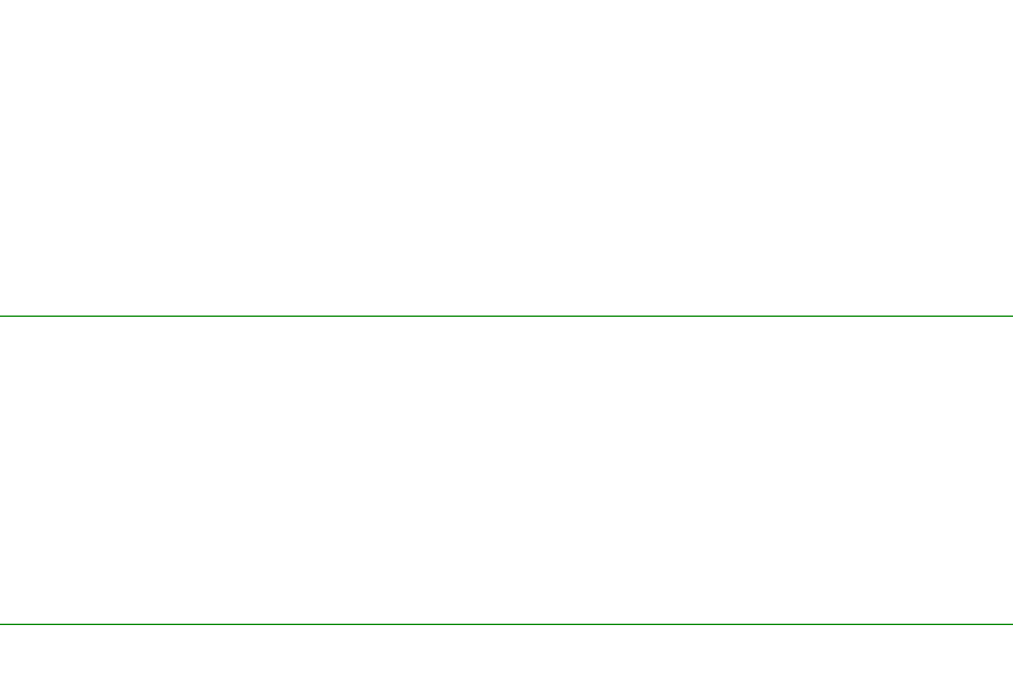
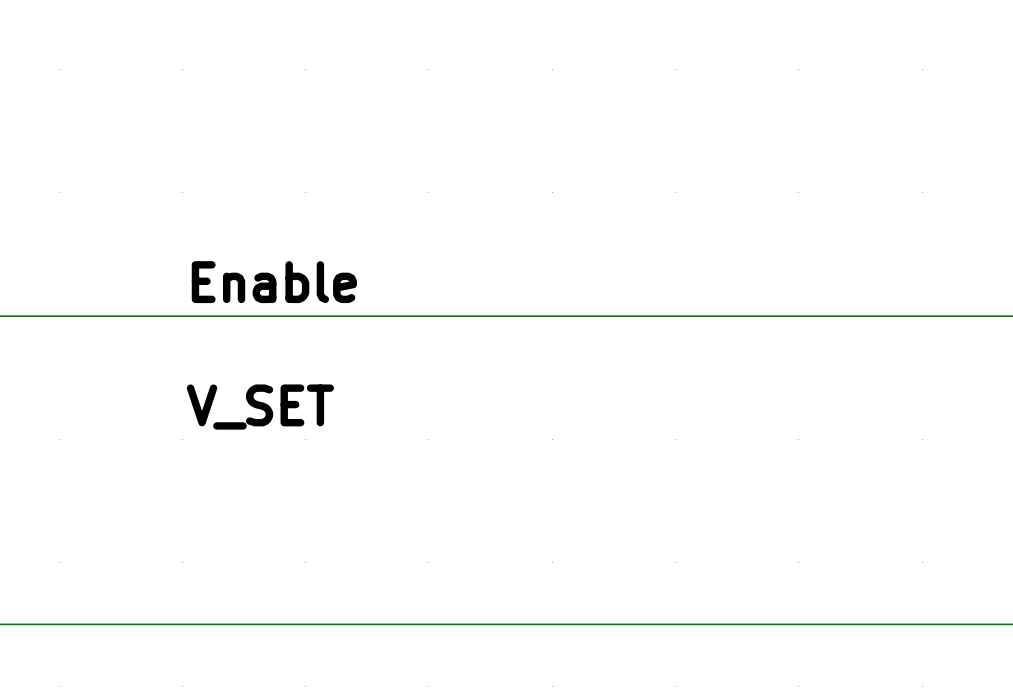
label: none -> Enable (274, 282)
label: none -> V_SET (260, 407)

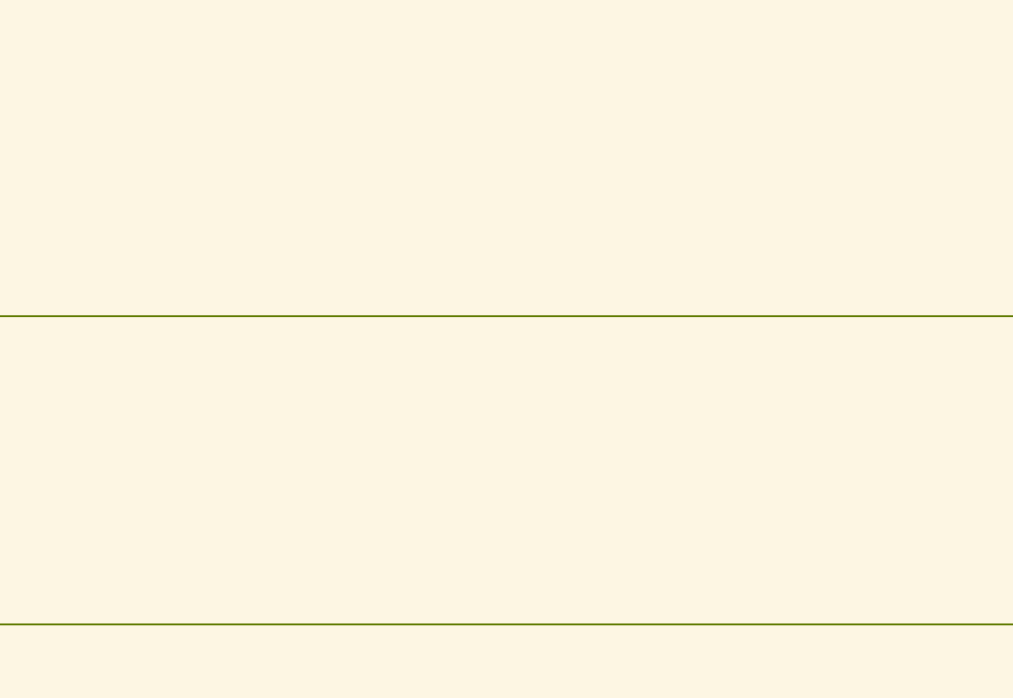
label: Enable (274, 282) -> none
label: V_SET (260, 407) -> none

